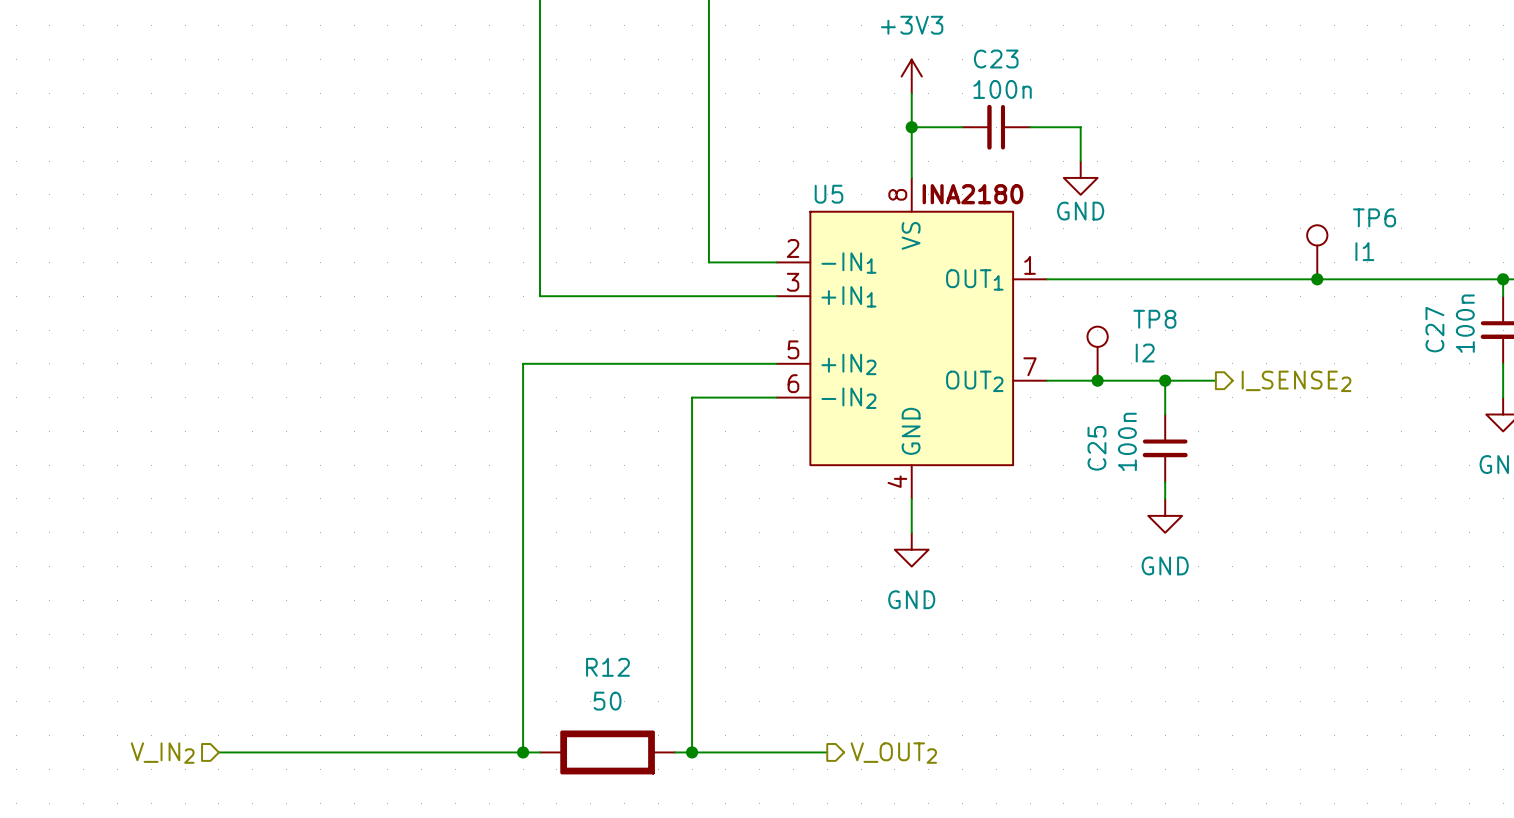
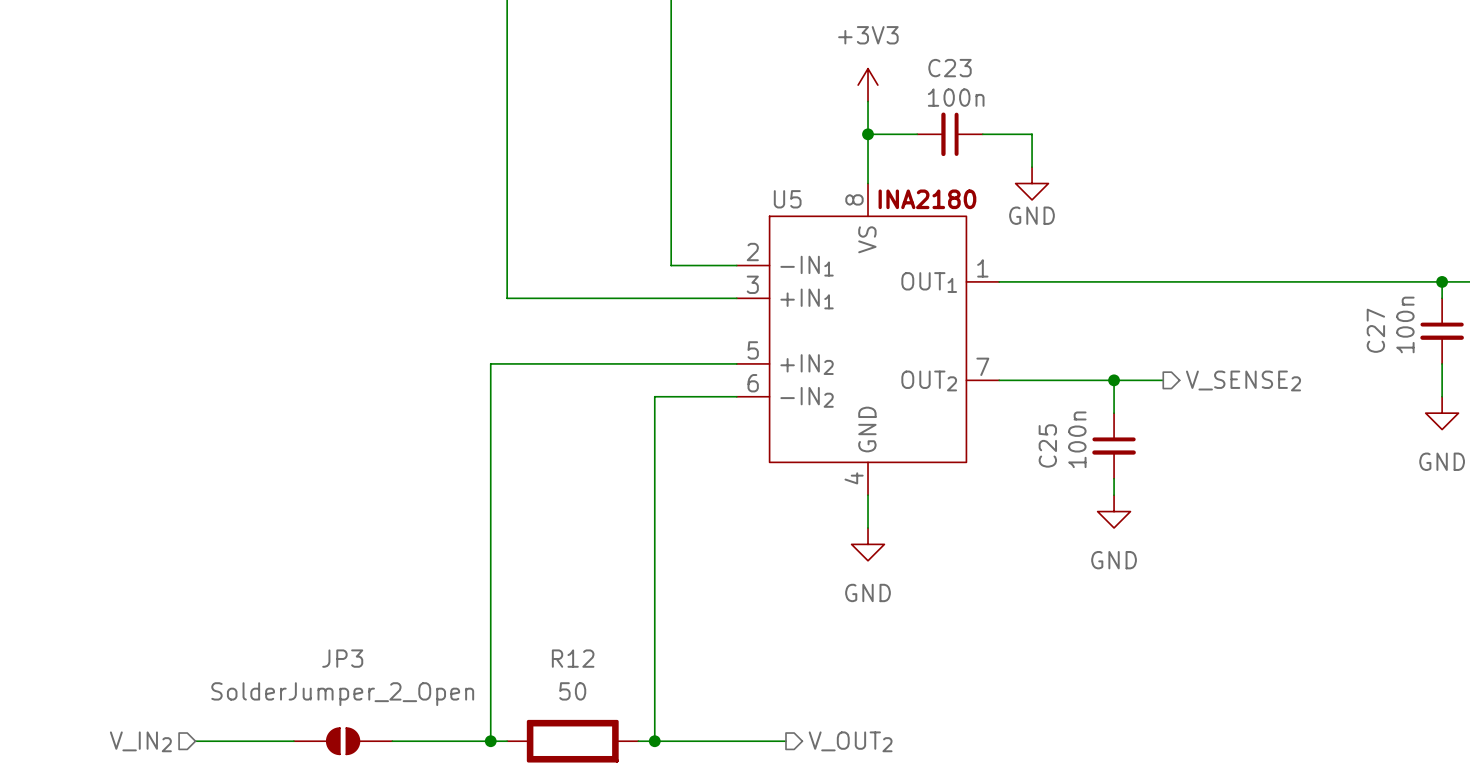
TP6: I1 (1317, 252) -> none
junction: (1317, 279) -> none
TP8: I2 (1097, 353) -> none
junction: (1097, 380) -> none
hierarchical label: I_SENSE2 (1296, 381) -> V_SENSE2 (1243, 380)
JP3: none -> SolderJumper_2_Open (343, 741)

